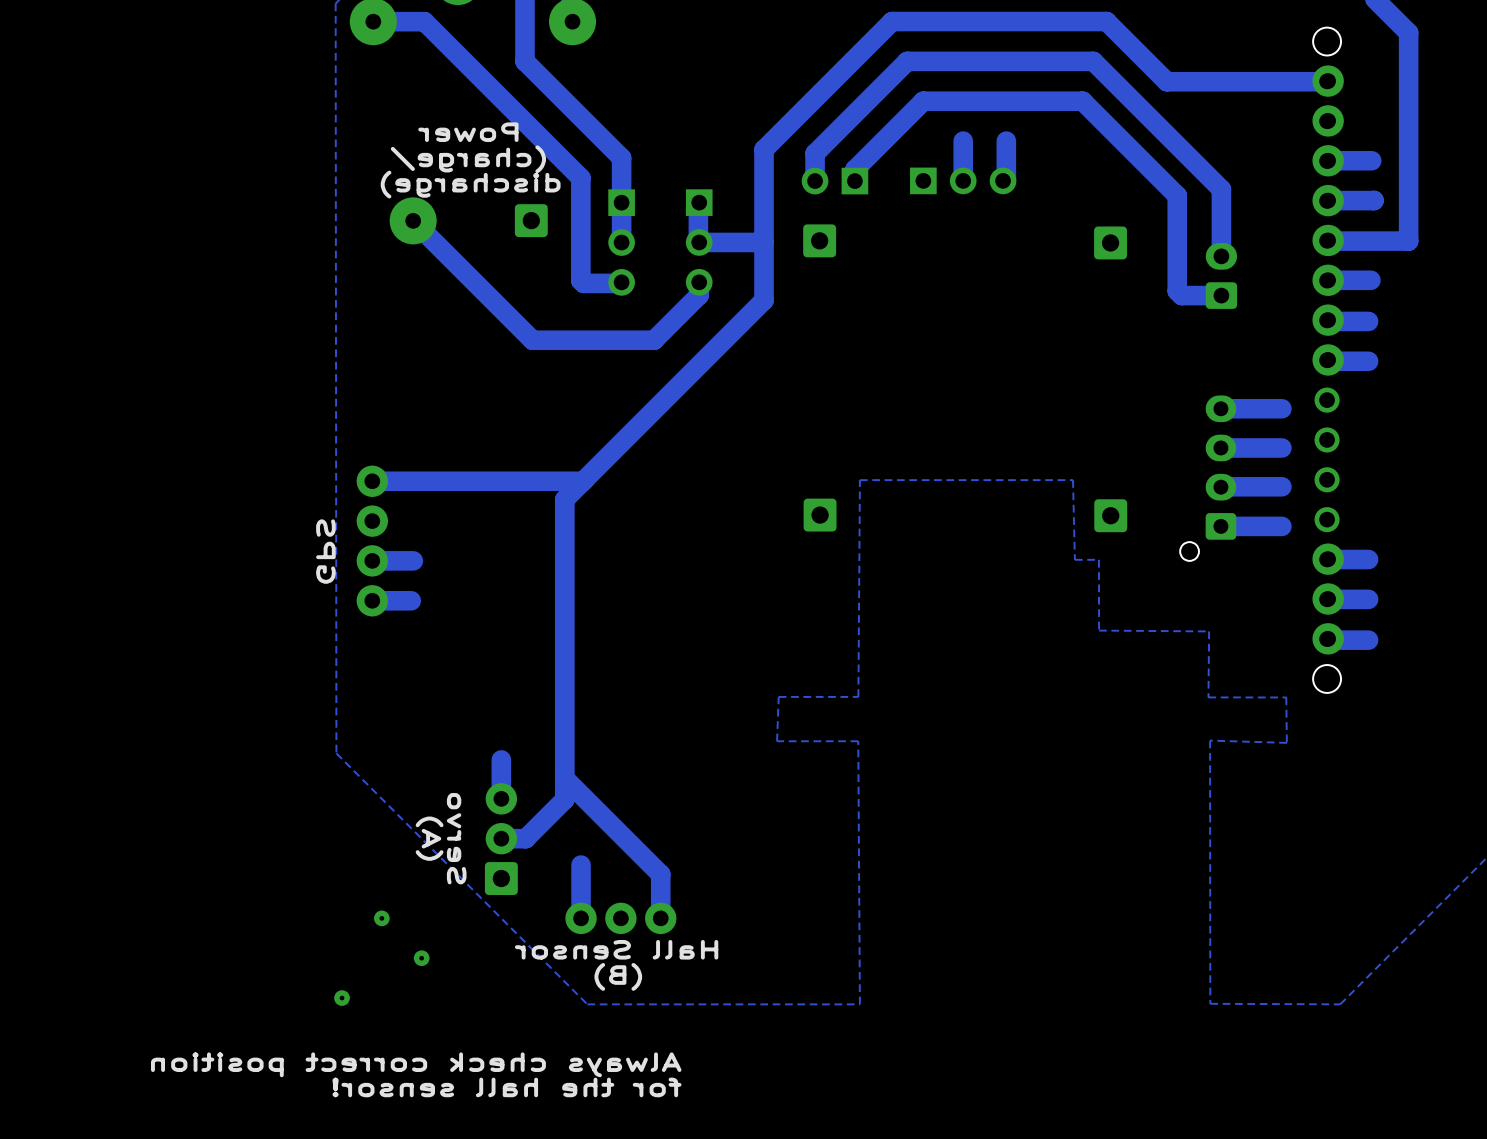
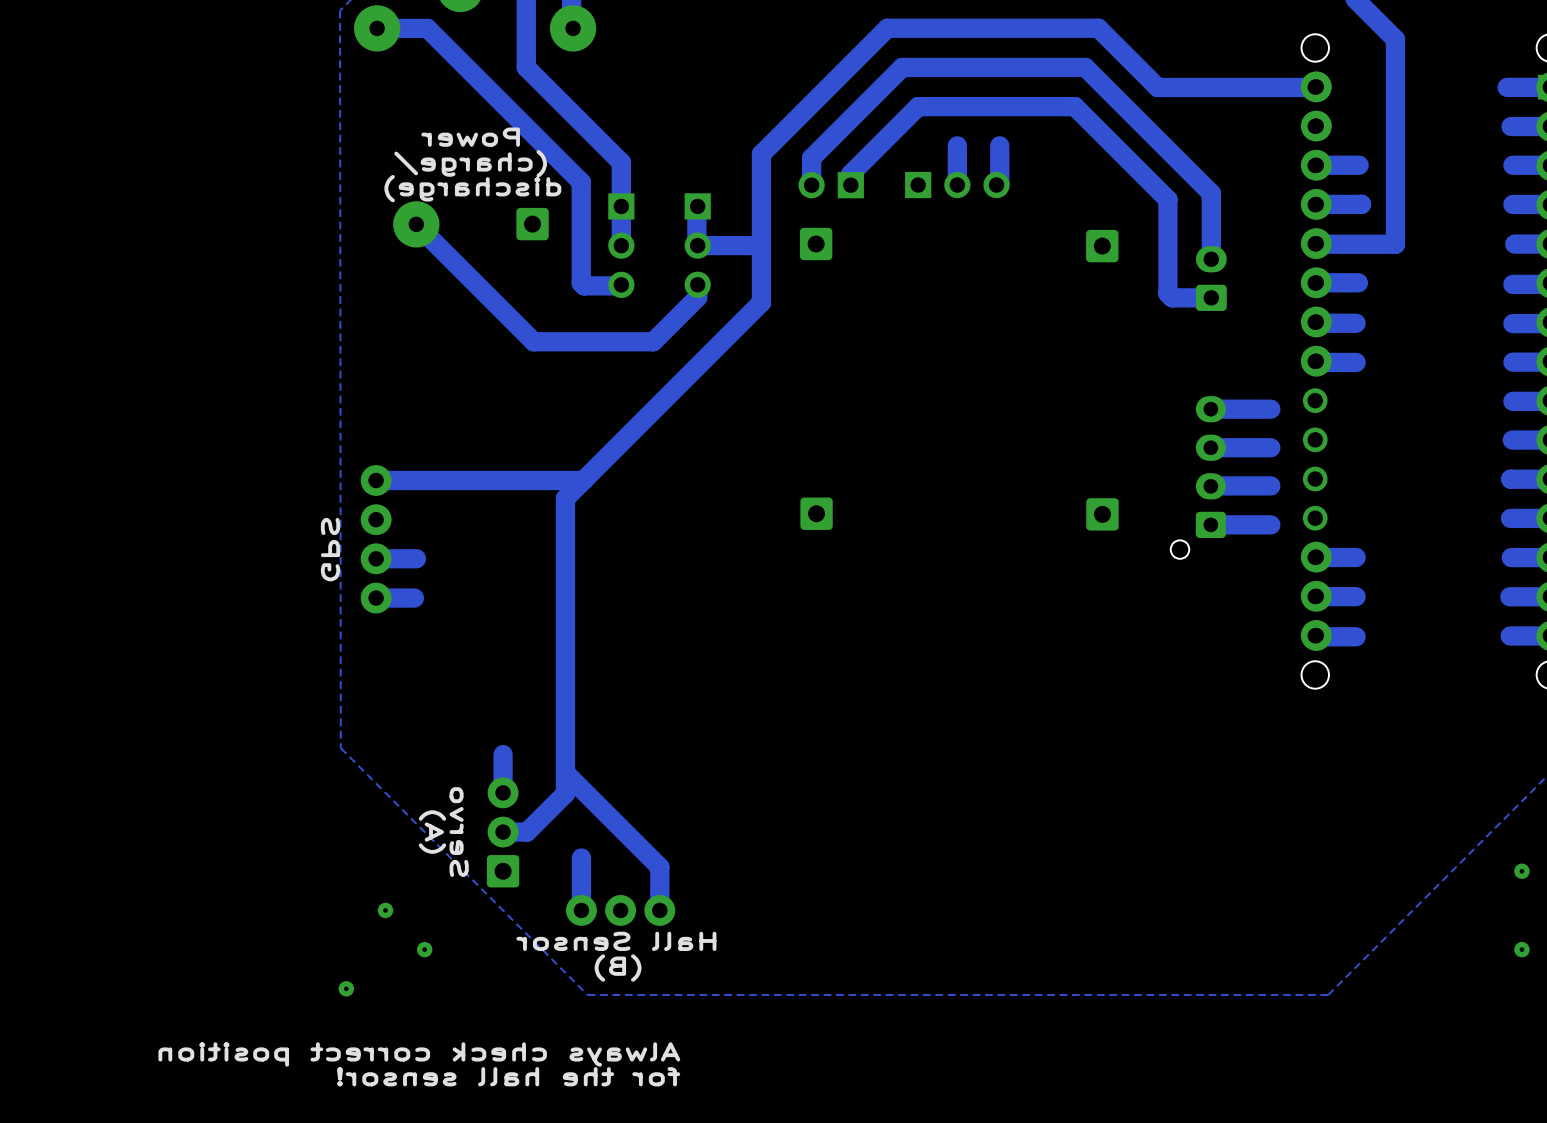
zone outline: (1340, 1004) (1210, 1003) (1210, 740) (1286, 742) (1286, 697) (1208, 697) (1209, 631) (1099, 630) (1098, 559) (1074, 559) (1072, 480) (859, 480) (858, 696) (778, 696) (777, 741) (858, 741) (859, 1004) -> (1328, 995) (855, 995)

